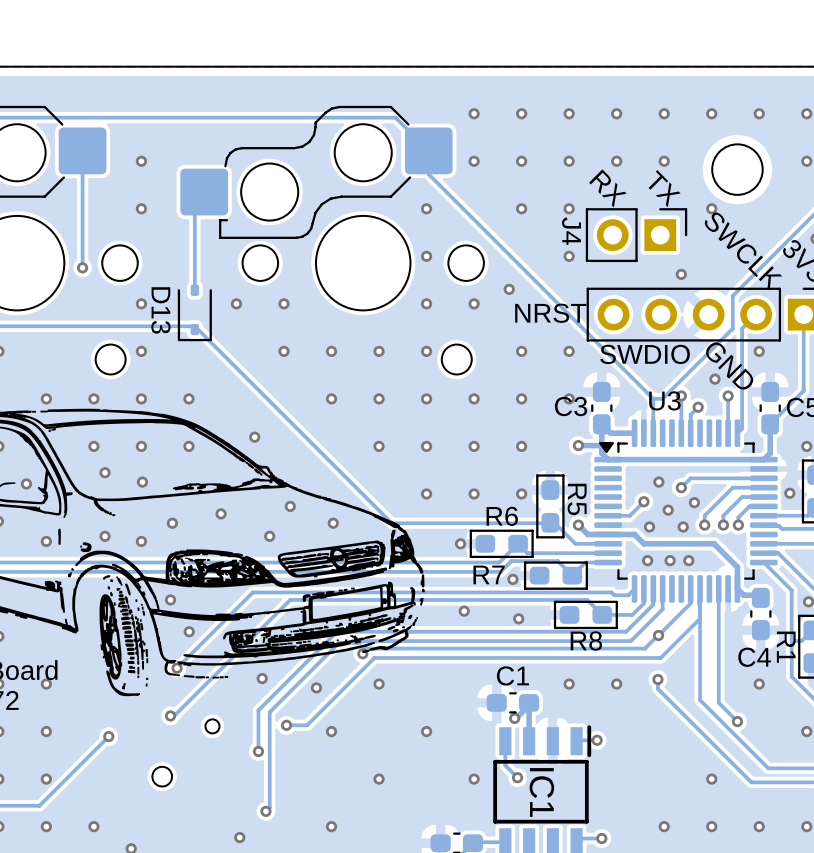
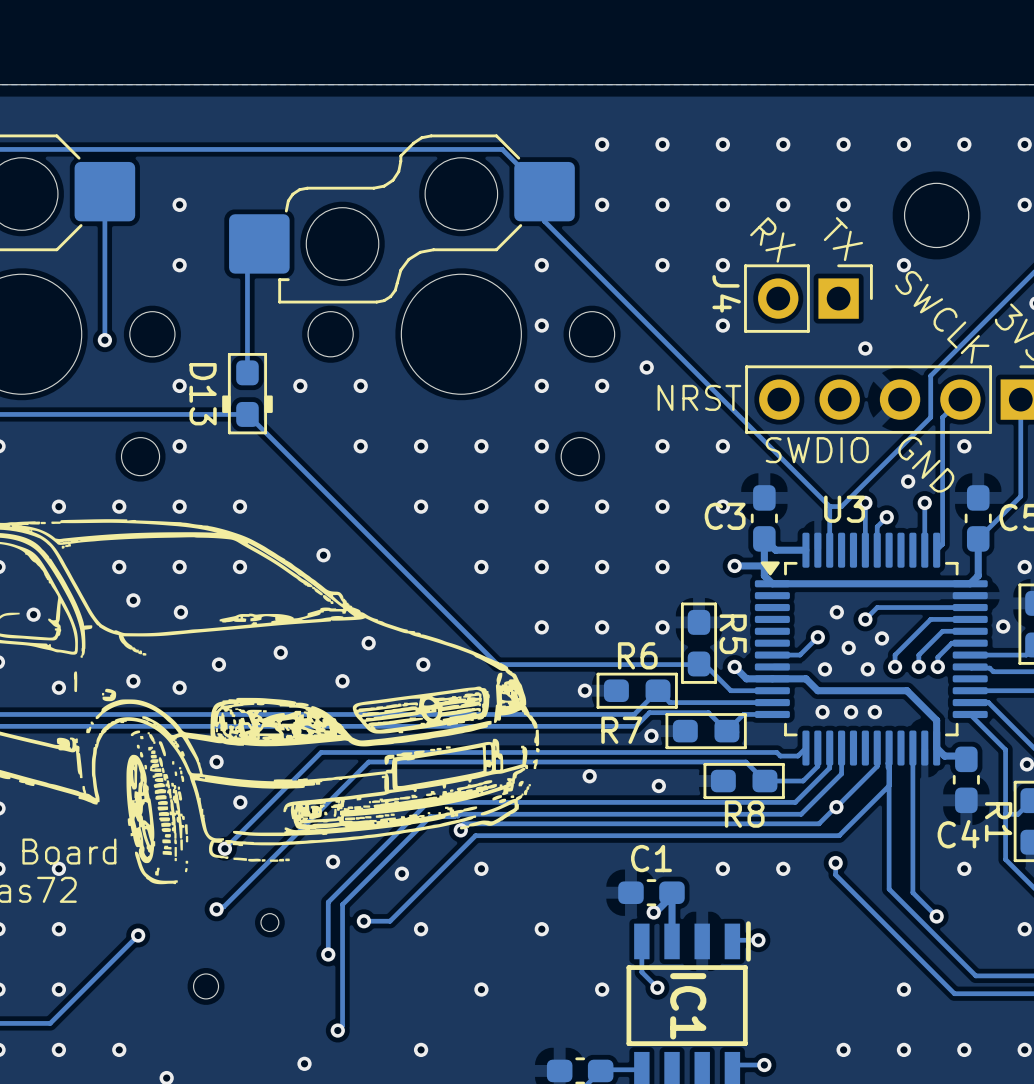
D13 footprint: [177, 284, 212, 342] -> [222, 352, 273, 435]

